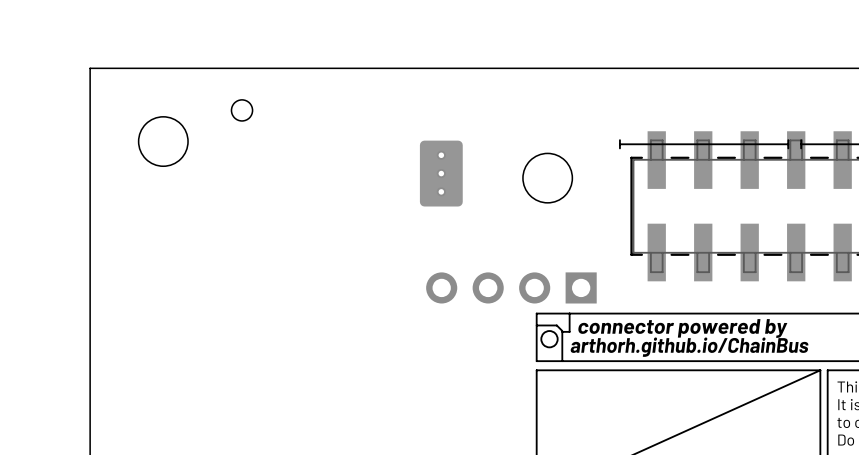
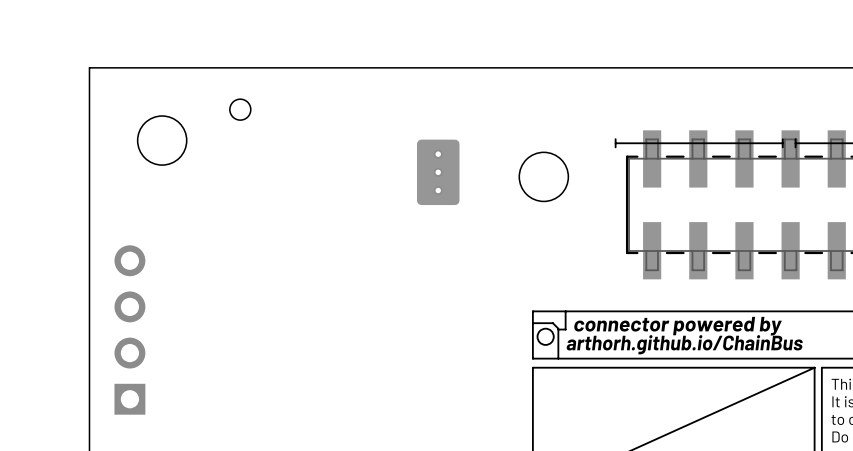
part rotation: 0° (511, 287) -> 90° clockwise (129, 330)
part position: (511, 287) -> (129, 330)

